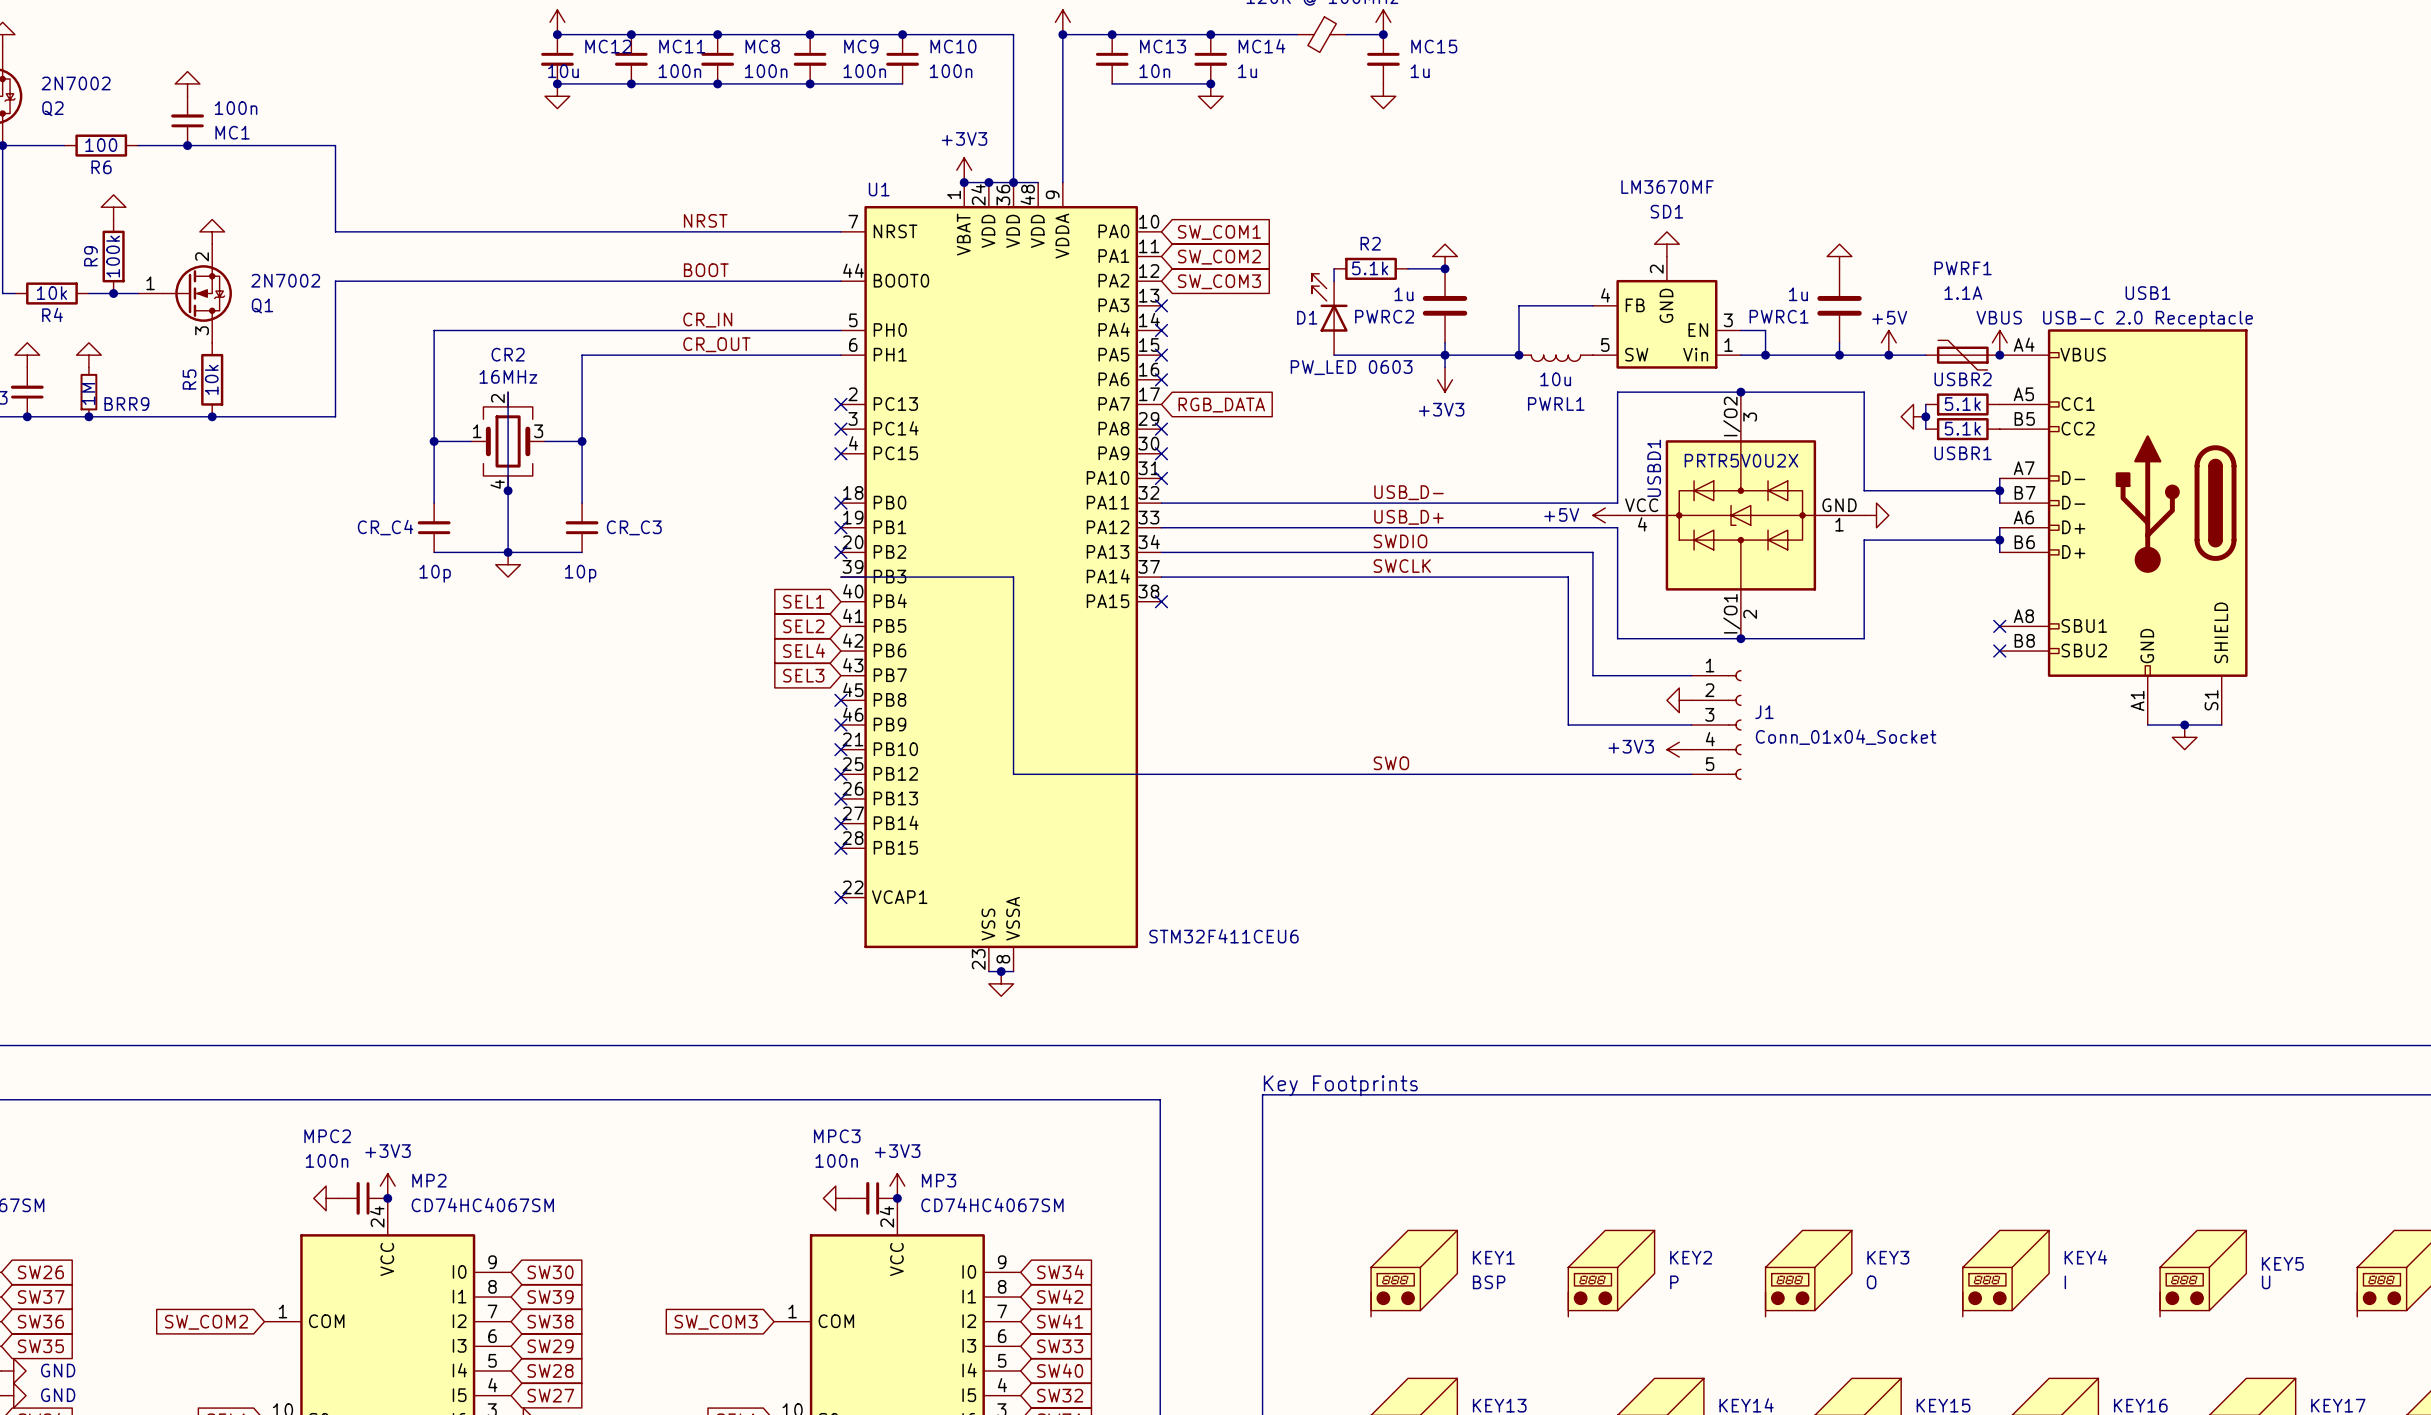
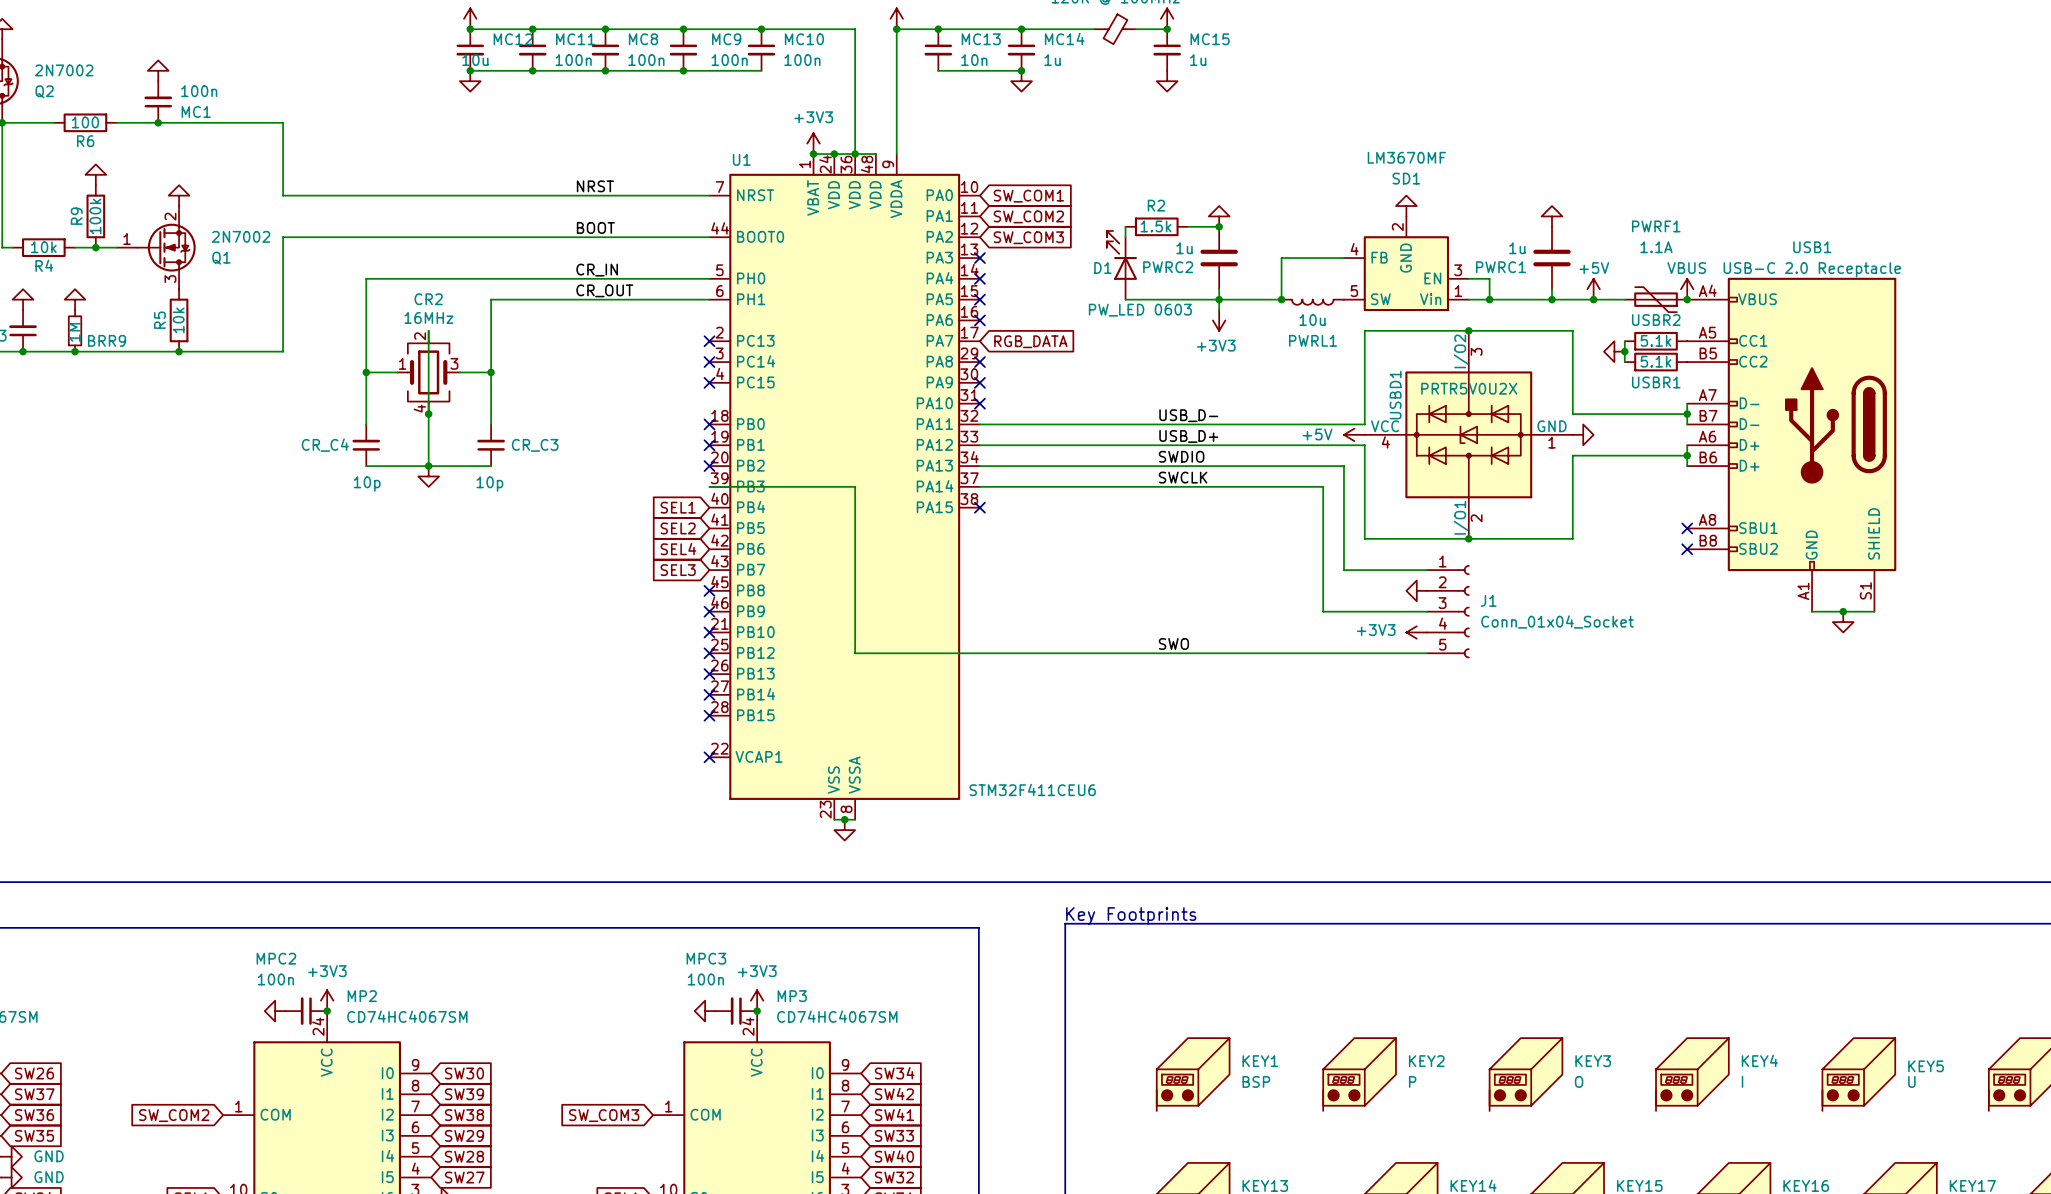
R2 value: 5.1k (1370, 268) -> 1.5k (1155, 226)

